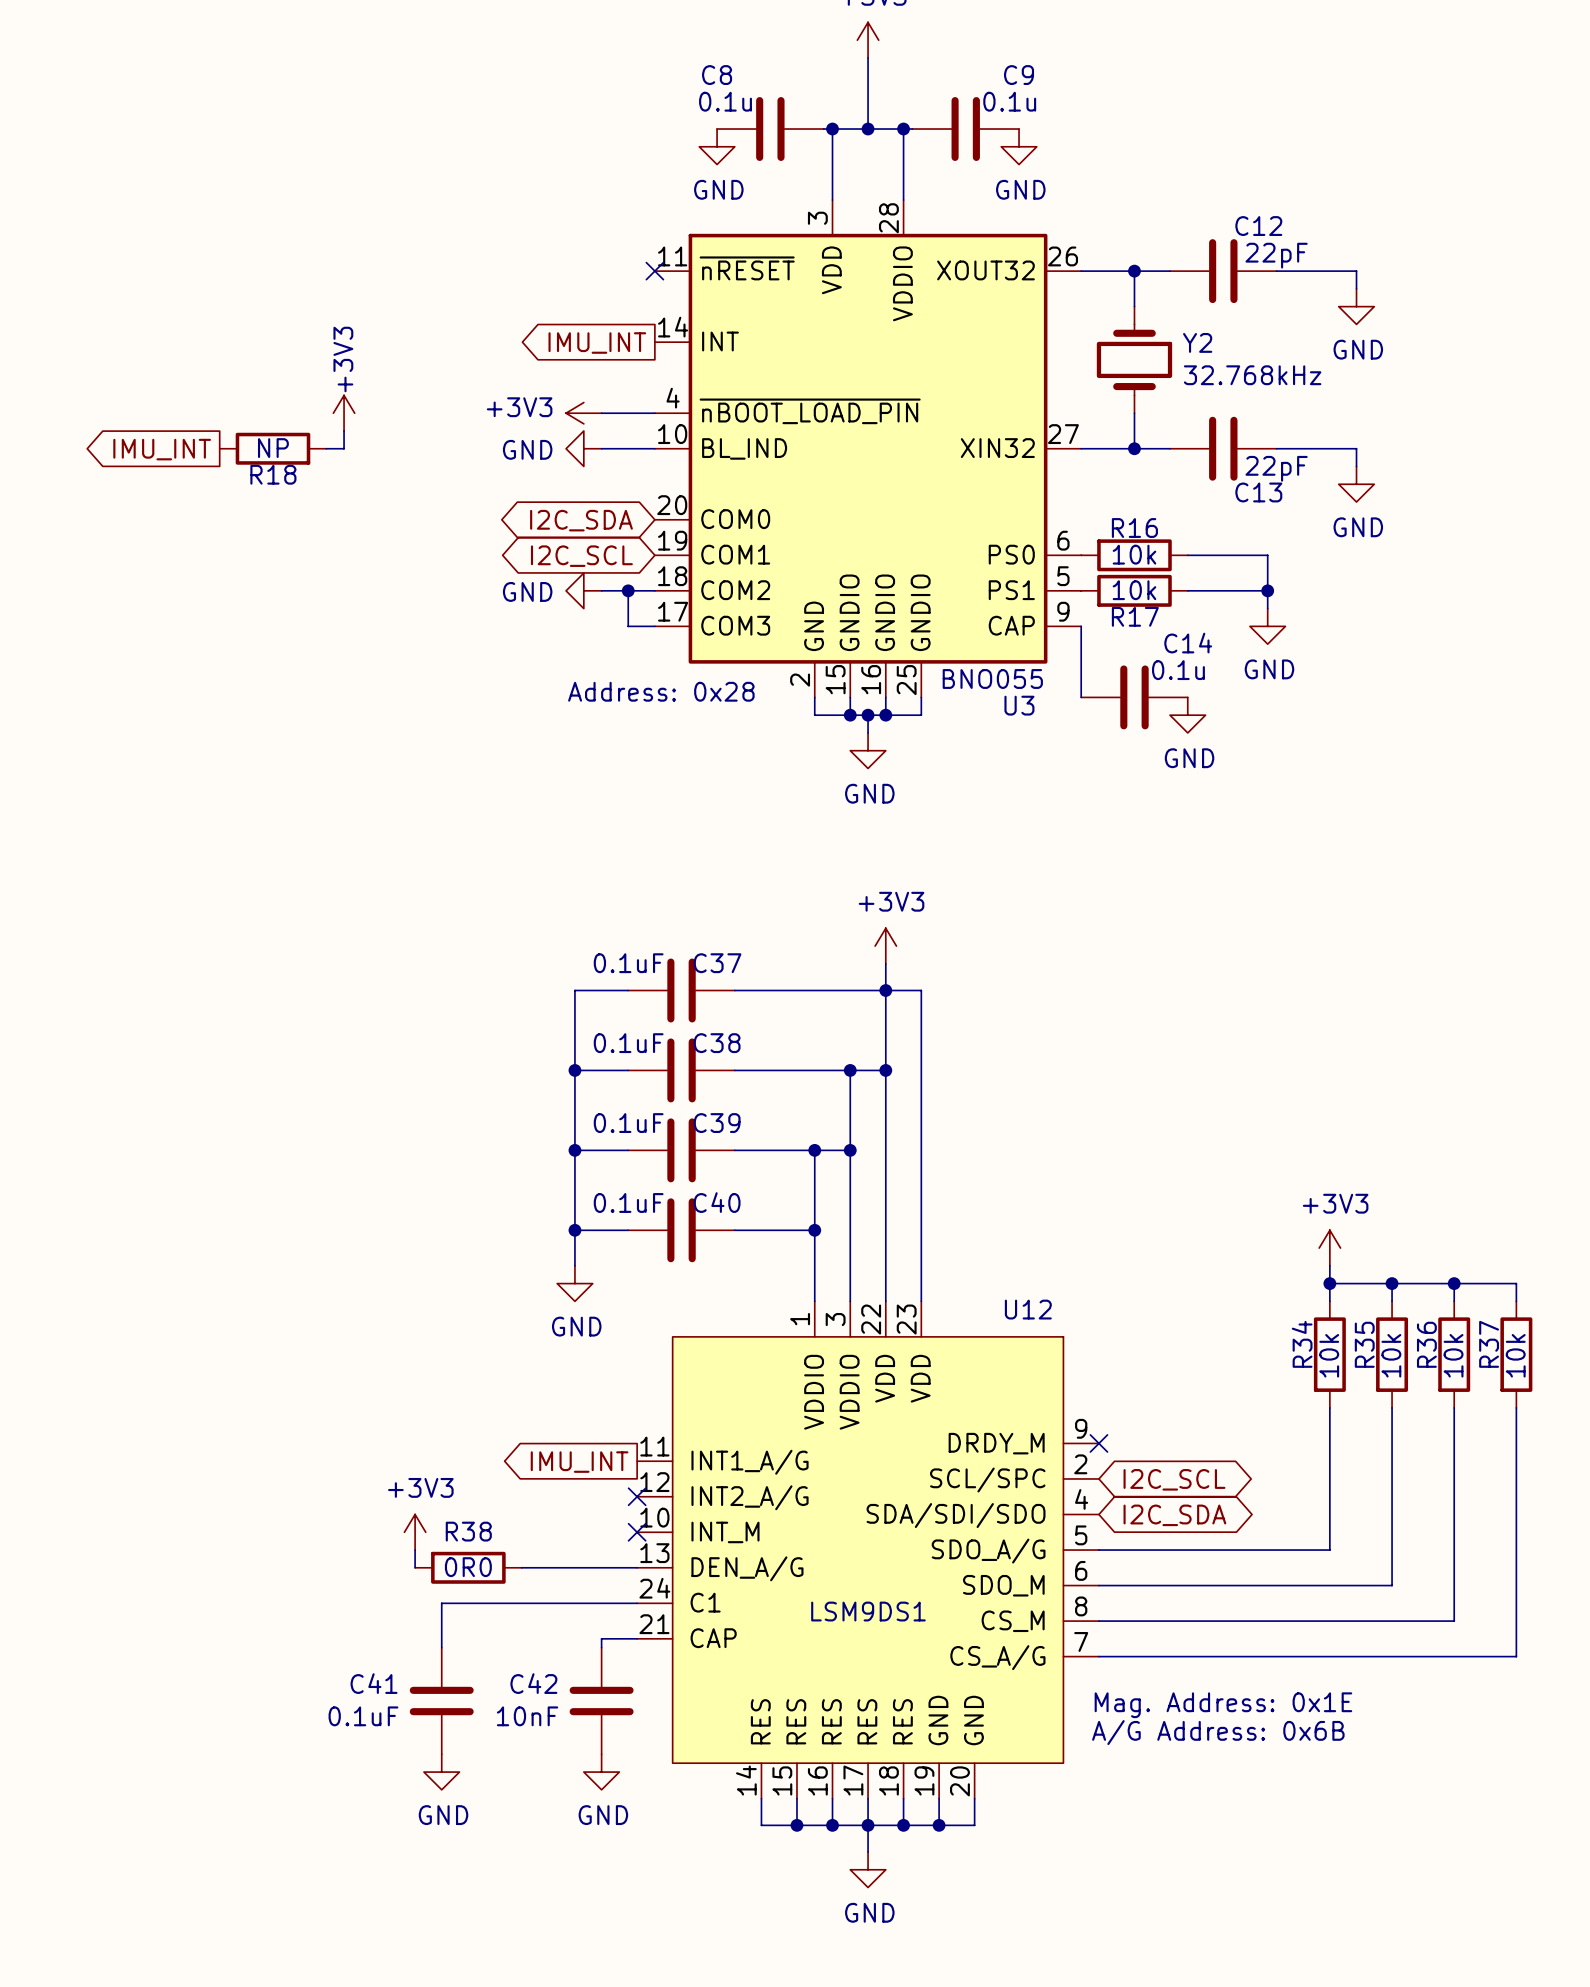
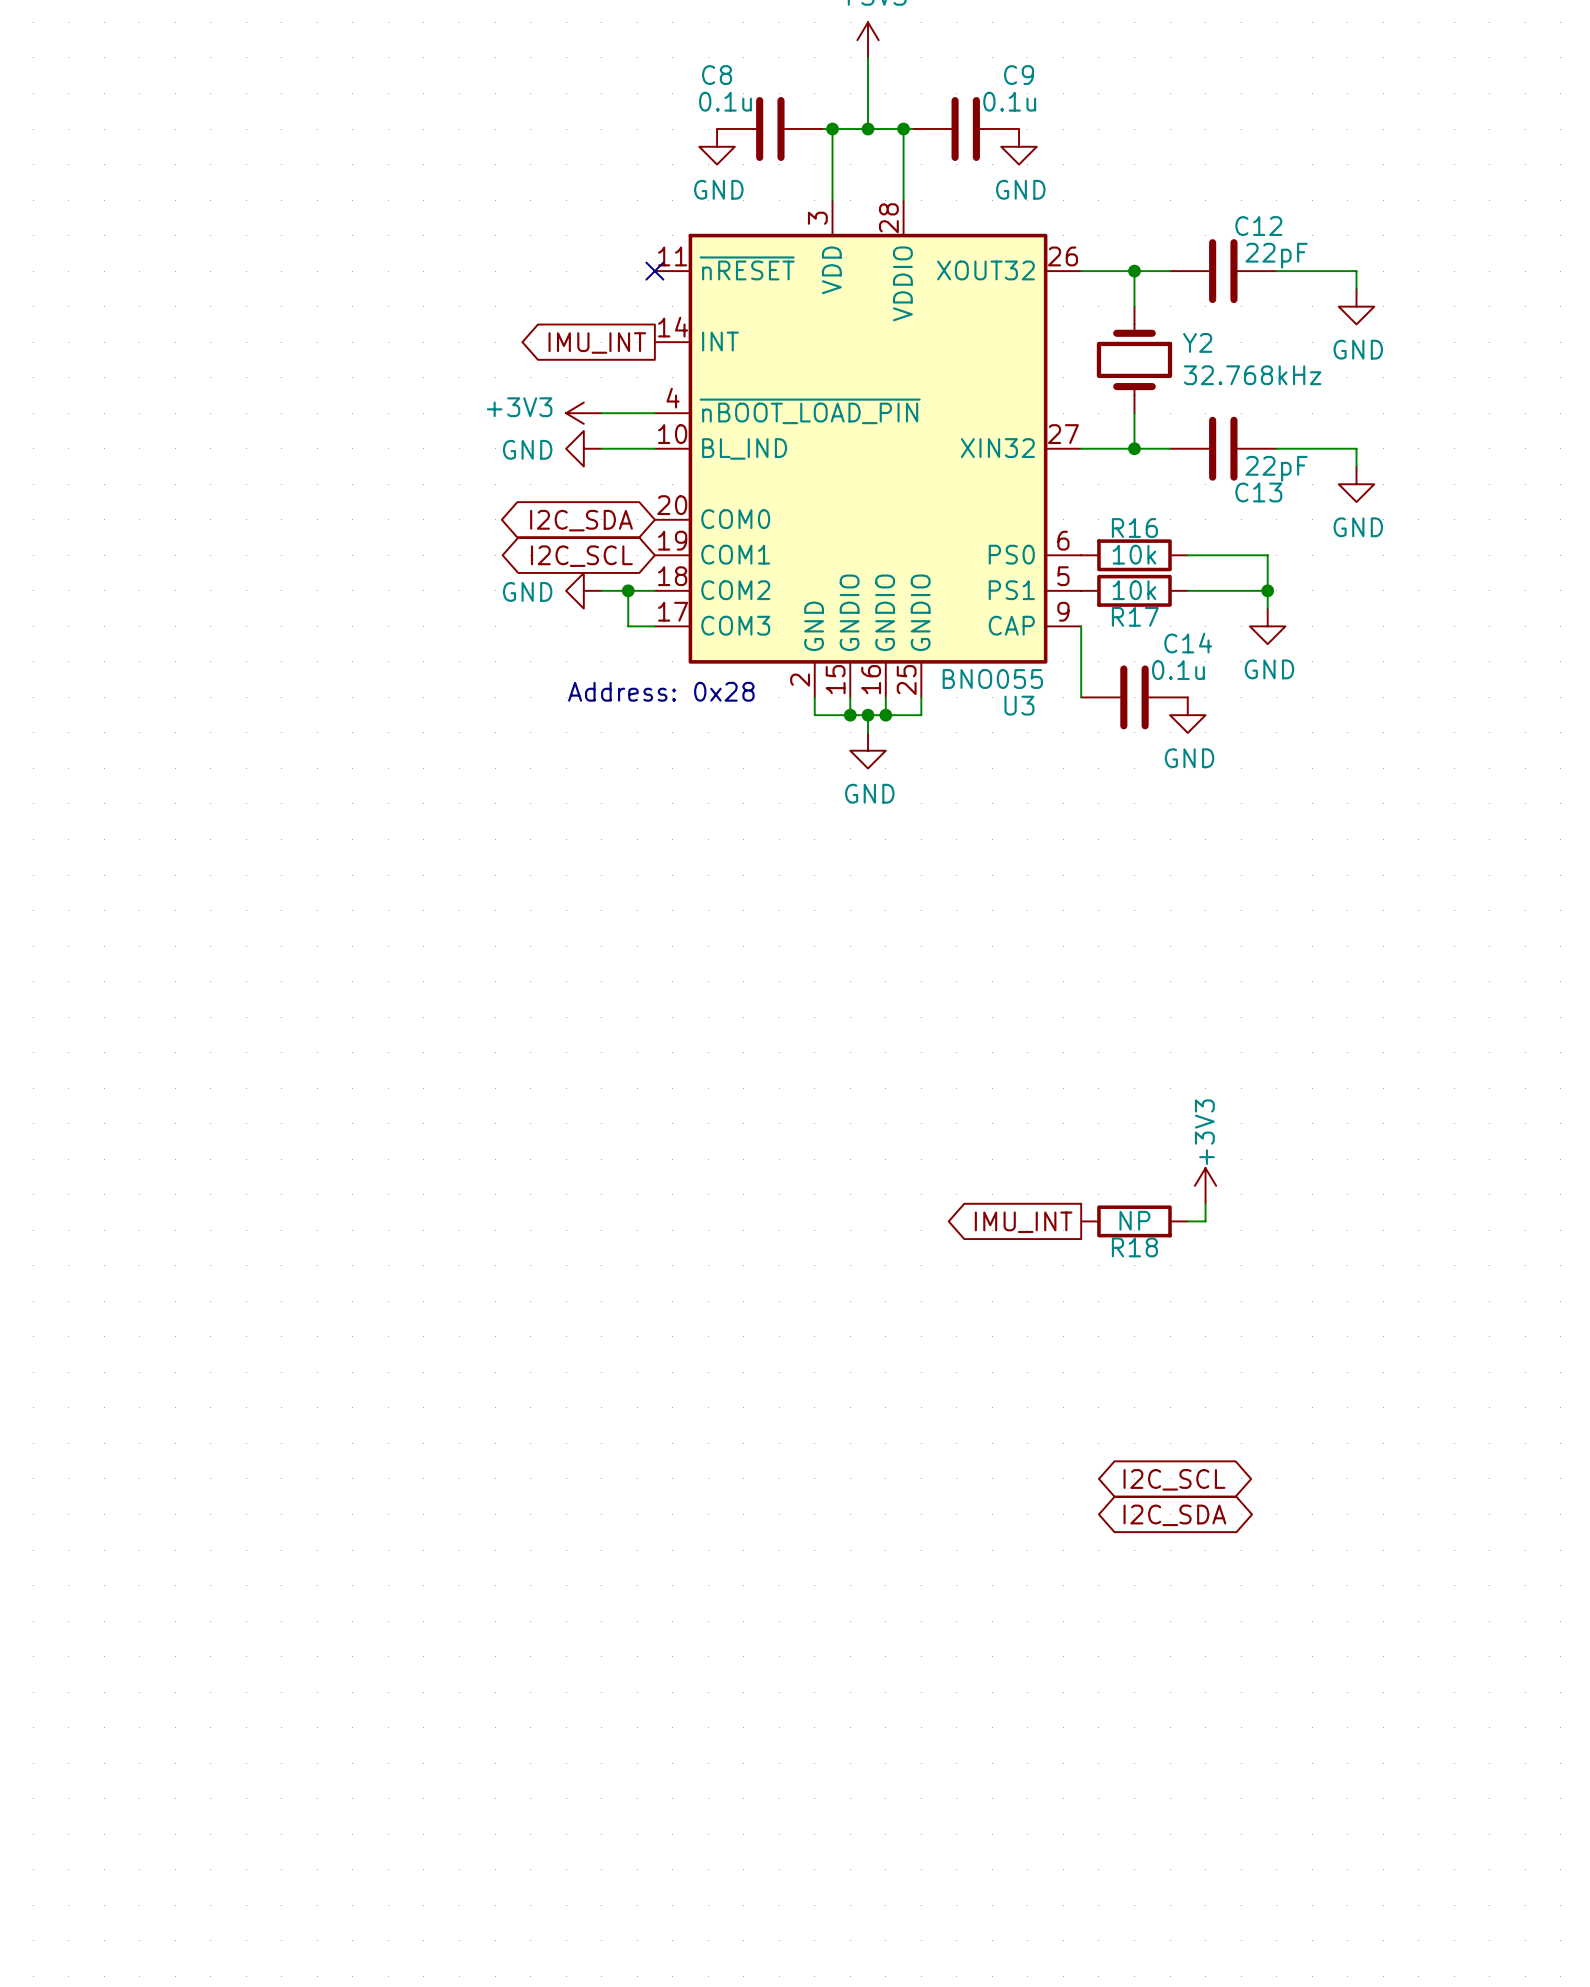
power symbol: +3V3 (344, 413) -> none
wire: (344, 430) (344, 448) (326, 448) -> none
R18 position: (272, 448) -> (1134, 1221)
global label: IMU_INT (162, 449) -> none
power symbol: +3V3 (885, 946) -> none
wire: (885, 963) (885, 1301) -> none
wire: (628, 990) (574, 990) (574, 1265) -> none
C37: (681, 990) -> none
wire: (734, 990) (921, 990) (921, 1301) -> none
junction: (885, 990) -> none
wire: (574, 1070) (628, 1070) -> none
junction: (574, 1070) -> none
C38: (681, 1070) -> none
wire: (734, 1070) (885, 1070) -> none
wire: (850, 1070) (850, 1301) -> none
junction: (850, 1070) -> none
junction: (885, 1070) -> none
wire: (574, 1150) (628, 1150) -> none
junction: (574, 1150) -> none
C39: (681, 1150) -> none
wire: (734, 1150) (850, 1150) -> none
wire: (814, 1150) (814, 1301) -> none
junction: (814, 1150) -> none
junction: (850, 1150) -> none
wire: none -> (1205, 1203) (1205, 1221) (1187, 1221)
power symbol text rotation: 0° (1335, 1203) -> 90° counterclockwise (1204, 1132)
global label: none -> IMU_INT (1023, 1222)
wire: (574, 1230) (628, 1230) -> none
junction: (574, 1230) -> none
C40: (681, 1230) -> none
wire: (734, 1230) (814, 1230) -> none
junction: (814, 1230) -> none
power symbol position: +3V3 (1329, 1248) -> +3V3 (1205, 1185)
wire: (1329, 1265) (1329, 1301) -> none
power symbol: GND (574, 1283) -> none
wire: (1329, 1283) (1516, 1283) (1516, 1301) -> none
junction: (1329, 1283) -> none
wire: (1392, 1283) (1392, 1301) -> none
junction: (1392, 1283) -> none
wire: (1454, 1283) (1454, 1301) -> none
junction: (1454, 1283) -> none
R34: (1329, 1354) -> none
R35: (1392, 1354) -> none
R36: (1454, 1354) -> none
R37: (1516, 1354) -> none
wire: (1329, 1407) (1329, 1550) (1098, 1550) -> none
wire: (1392, 1407) (1392, 1585) (1098, 1585) -> none
wire: (1454, 1407) (1454, 1621) (1098, 1621) -> none
wire: (1516, 1407) (1516, 1656) (1098, 1656) -> none
no-connect mark: (1098, 1443) -> none
global label: IMU_INT (579, 1462) -> none
no-connect mark: (637, 1496) -> none
power symbol: +3V3 (415, 1532) -> none
no-connect mark: (637, 1532) -> none
wire: (415, 1550) (415, 1567) -> none
U12: (868, 1550) -> none
R38: (468, 1567) -> none
wire: (521, 1567) (637, 1567) -> none
wire: (637, 1603) (441, 1603) (441, 1647) -> none
wire: (637, 1638) (601, 1638) (601, 1647) -> none
C41: (441, 1701) -> none
C42: (601, 1701) -> none
text: Mag. Address: 0x1E (1223, 1705) -> none
text: A/G Address: 0x6B (1218, 1732) -> none
power symbol: GND (441, 1772) -> none
power symbol: GND (601, 1772) -> none
wire: (761, 1798) (761, 1825) (974, 1825) (974, 1798) -> none
wire: (796, 1798) (796, 1825) -> none
wire: (832, 1798) (832, 1825) -> none
wire: (868, 1798) (868, 1852) -> none
wire: (903, 1798) (903, 1825) -> none
wire: (939, 1798) (939, 1825) -> none
junction: (796, 1825) -> none
junction: (832, 1825) -> none
junction: (868, 1825) -> none
junction: (903, 1825) -> none
junction: (939, 1825) -> none
power symbol: GND (868, 1869) -> none

